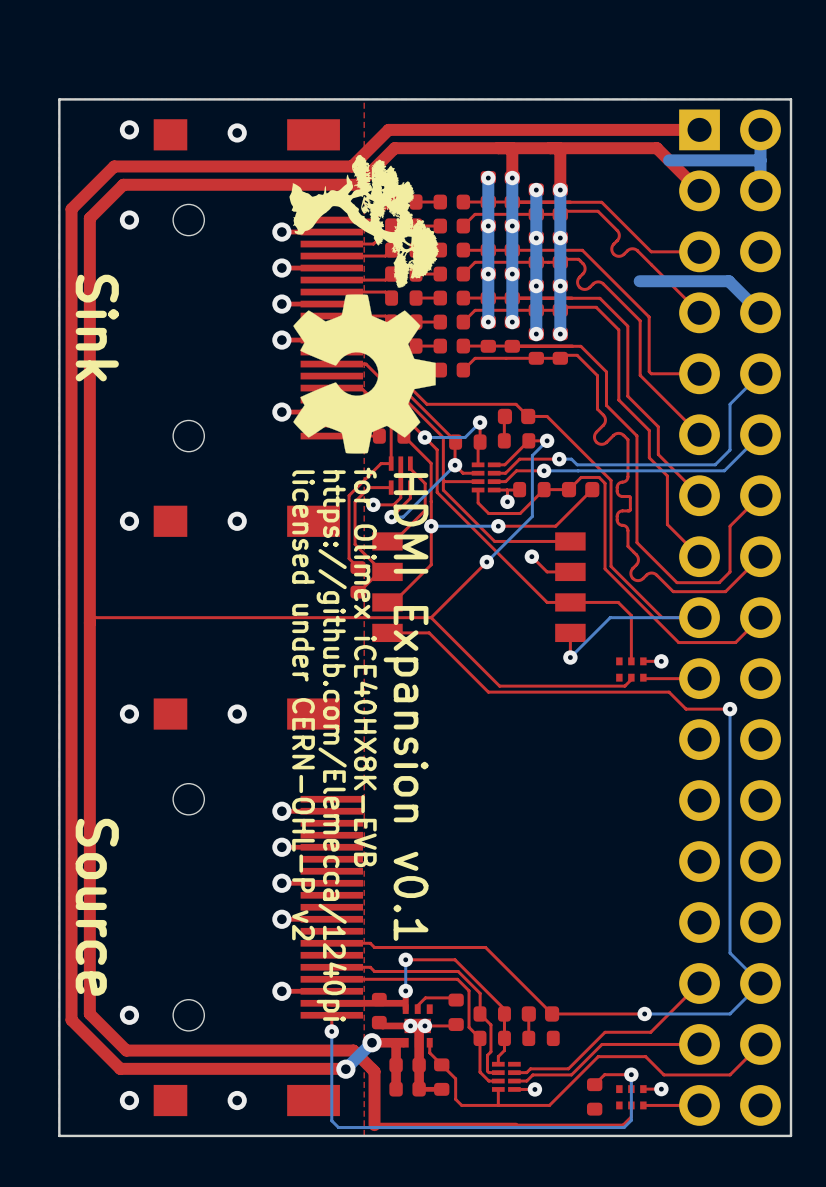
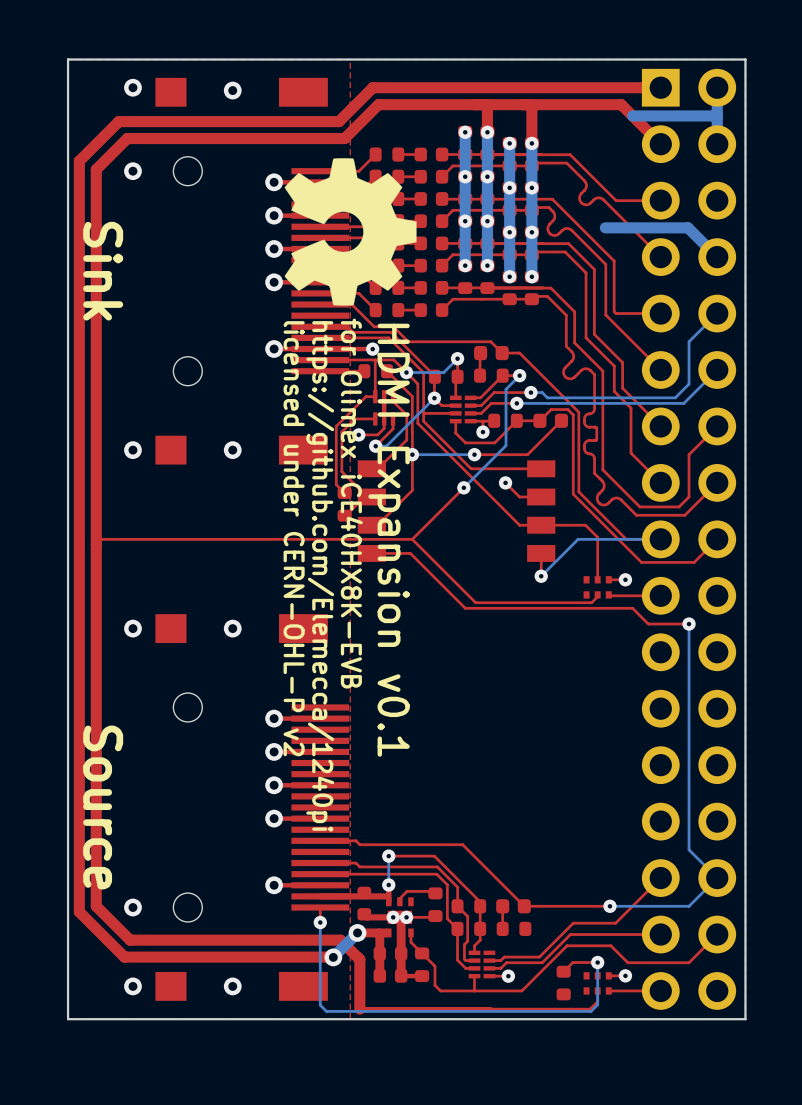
drawing: [289, 154, 439, 288] -> none
drawing position: (364, 374) -> (350, 231)
text position: for Olimex iCE40HX8K-EVB (365, 667) -> for Olimex iCE40HX8K-EVB (351, 503)
text position: licensed under CERN-OHL-P v2 (303, 705) -> licensed under CERN-OHL-P v2 (294, 538)
text position: HDMI Expansion v0.1 (406, 707) -> HDMI Expansion v0.1 (389, 540)
text position: https://github.com/Elemecca/1240pi (331, 746) -> https://github.com/Elemecca/1240pi (320, 576)

